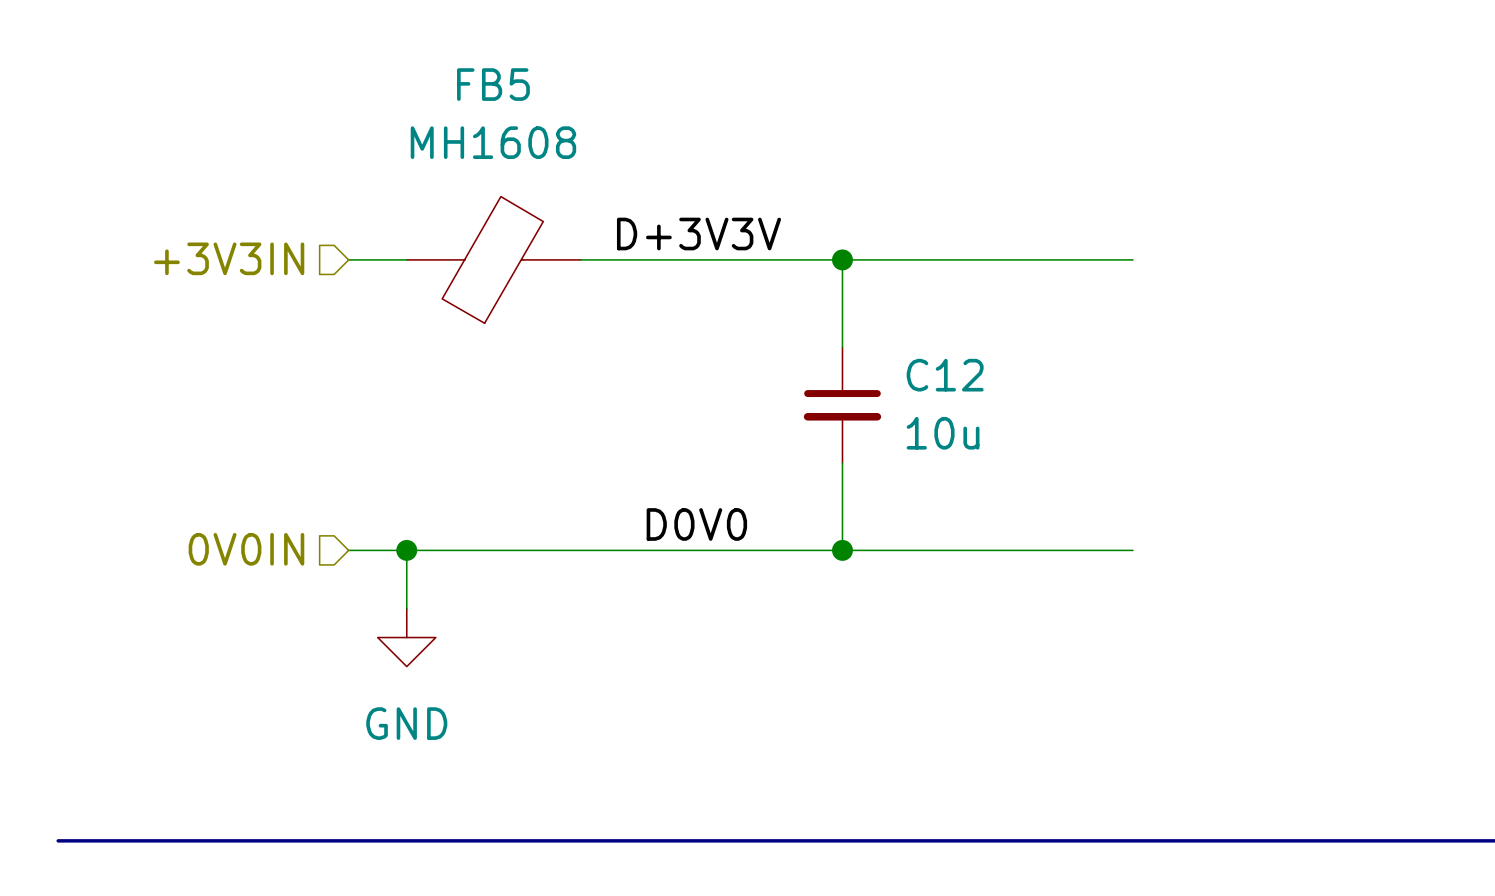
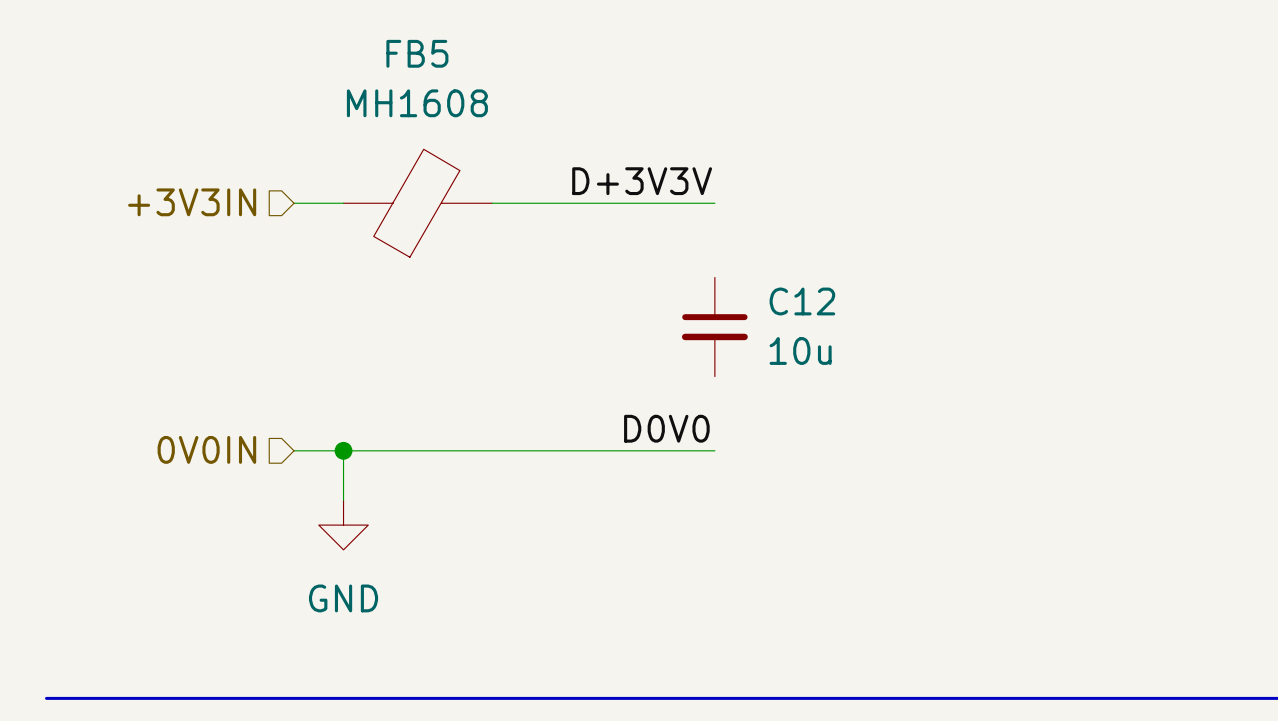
label position: D+3V3V (699, 234) -> D+3V3V (642, 181)
junction: (842, 259) -> none
wire: (1132, 259) (842, 259) (842, 347) -> none
wire: (842, 463) (842, 550) (1132, 550) -> none
label position: D0V0 (696, 524) -> D0V0 (666, 428)
junction: (842, 550) -> none

